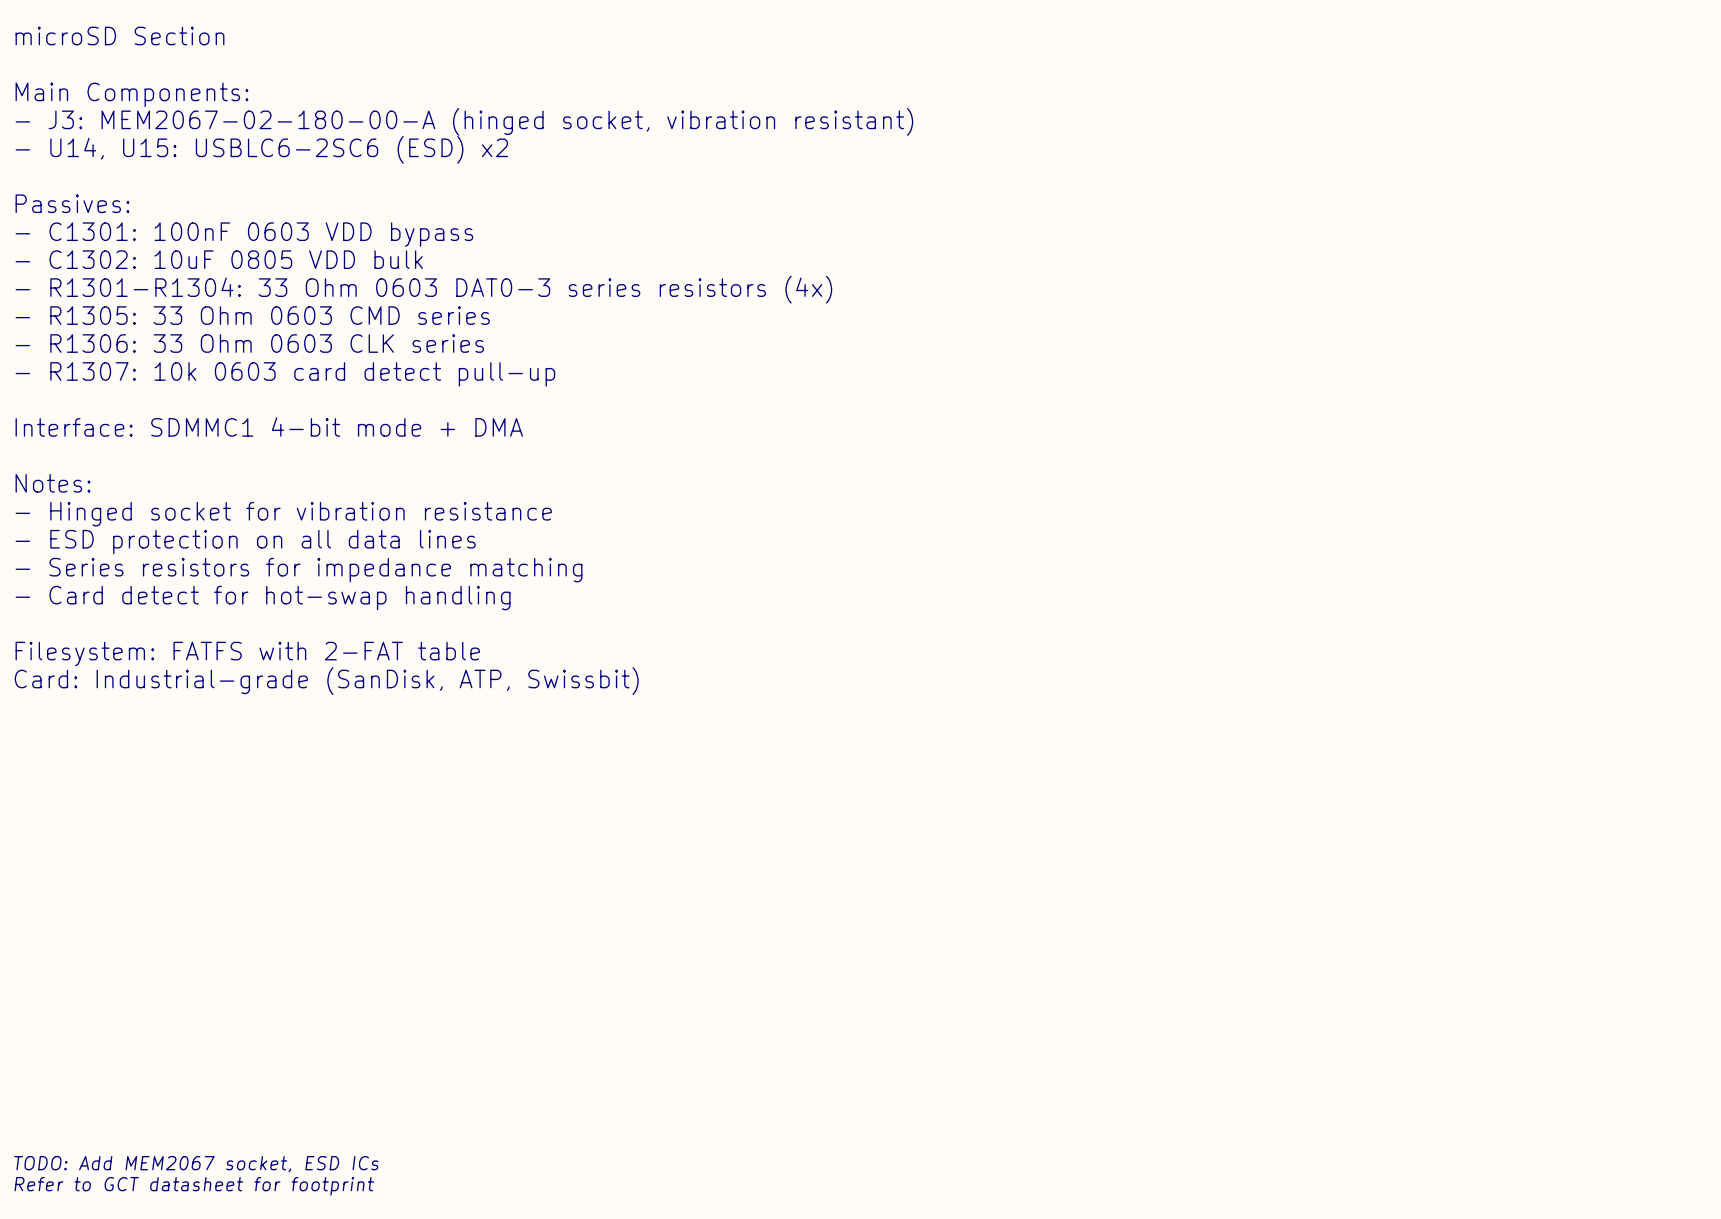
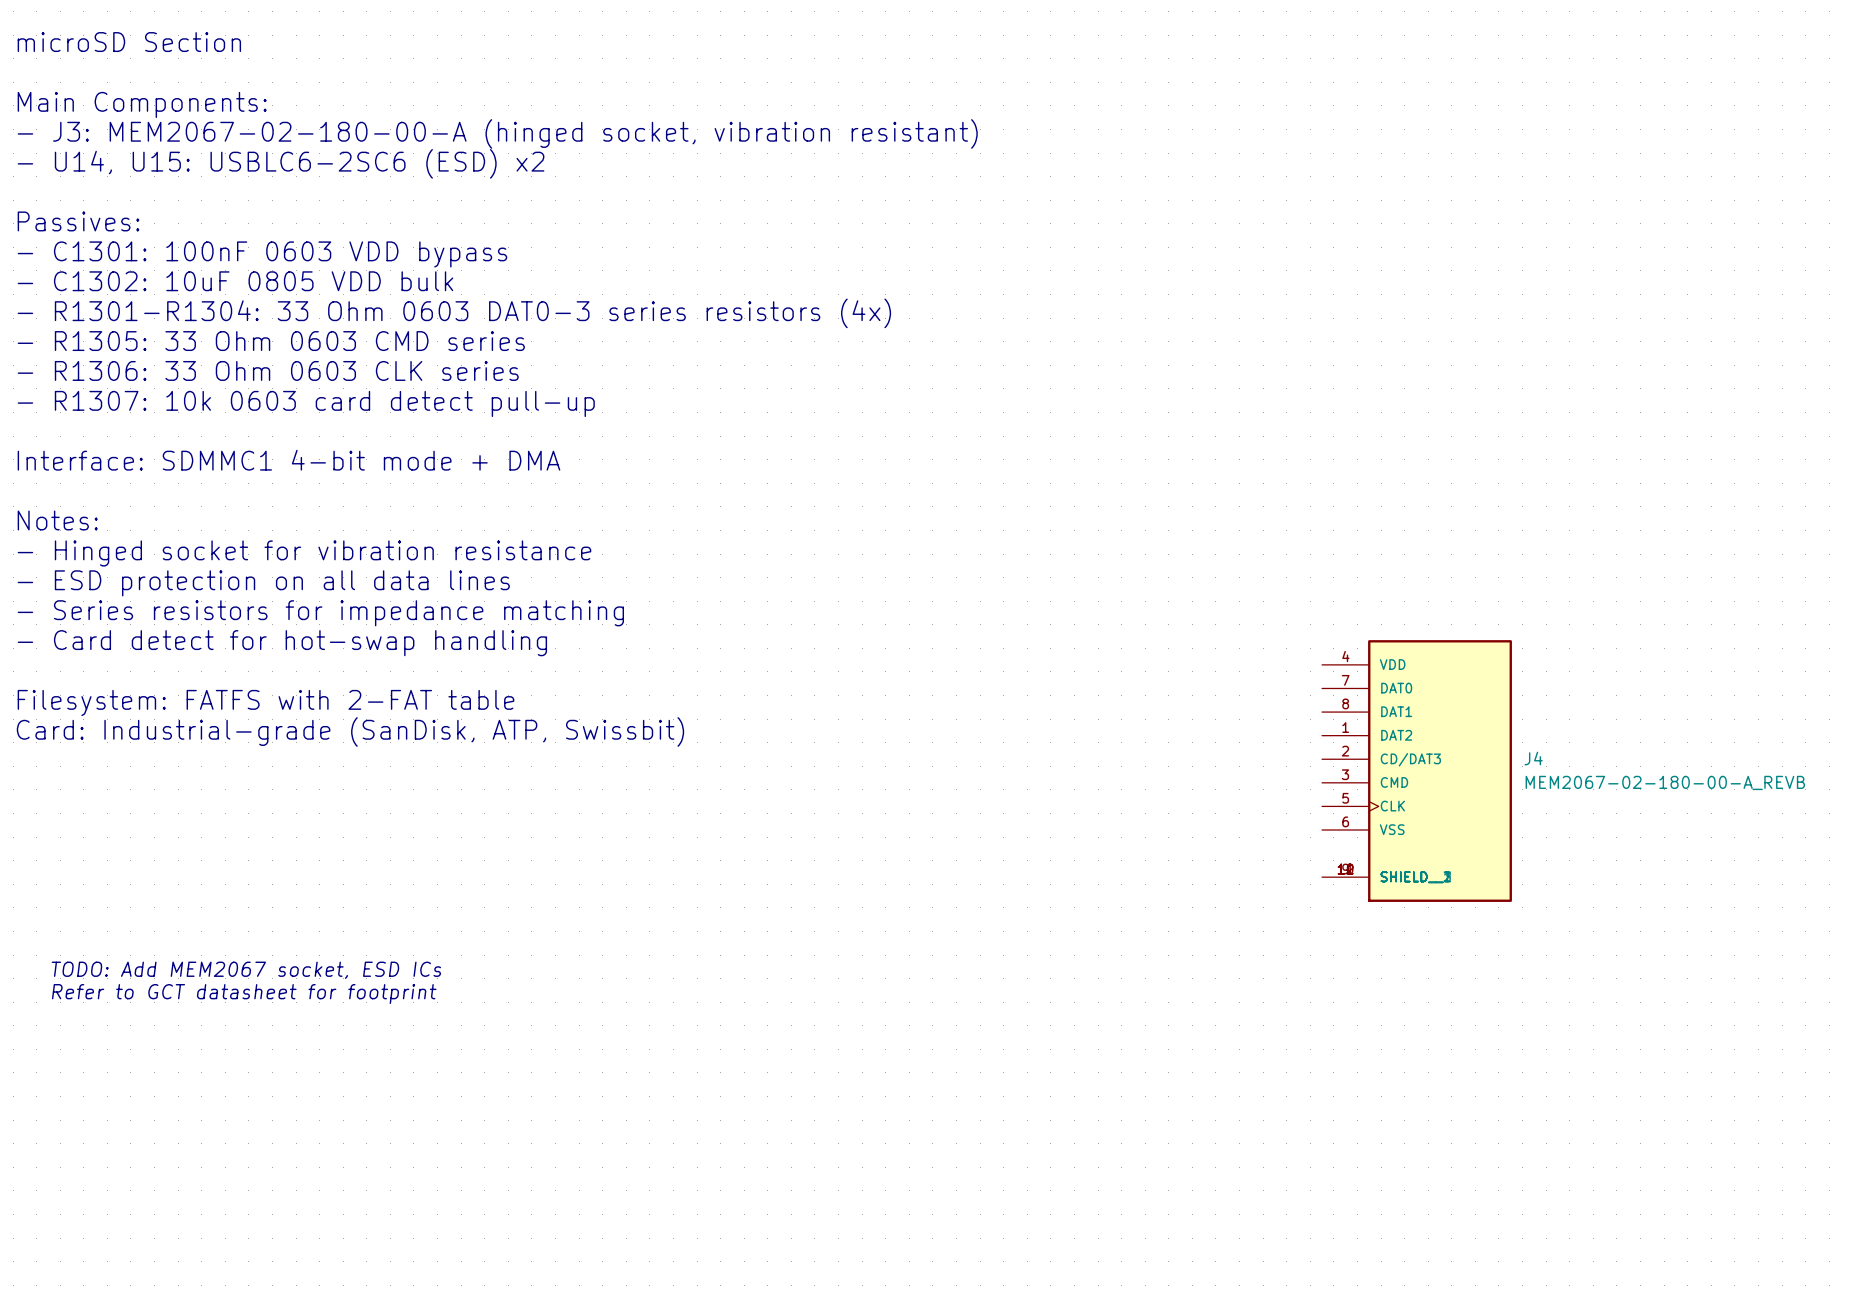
J4: none -> MEM2067-02-180-00-A_REVB (1417, 771)
text: none -> TODO: Add MEM2067 socket, ESD ICs (246, 970)
text: none -> Refer to GCT datasheet for footprint (244, 994)
text: TODO: Add MEM2067 socket, ESD ICs (196, 1164) -> none
text: Refer to GCT datasheet for footprint (194, 1186) -> none

